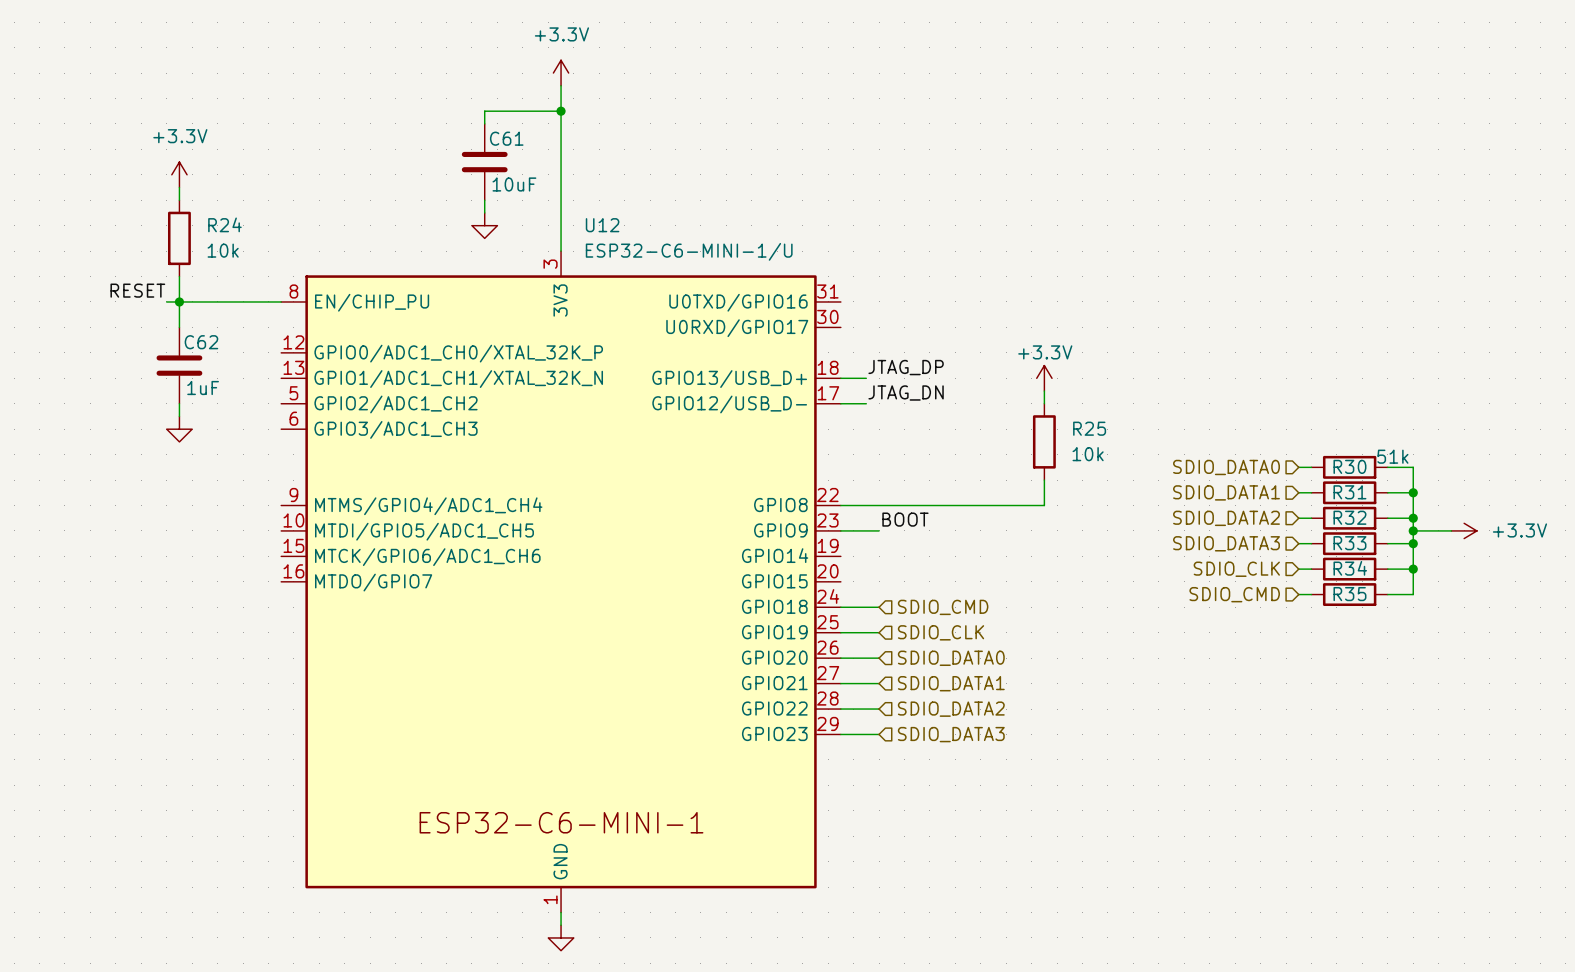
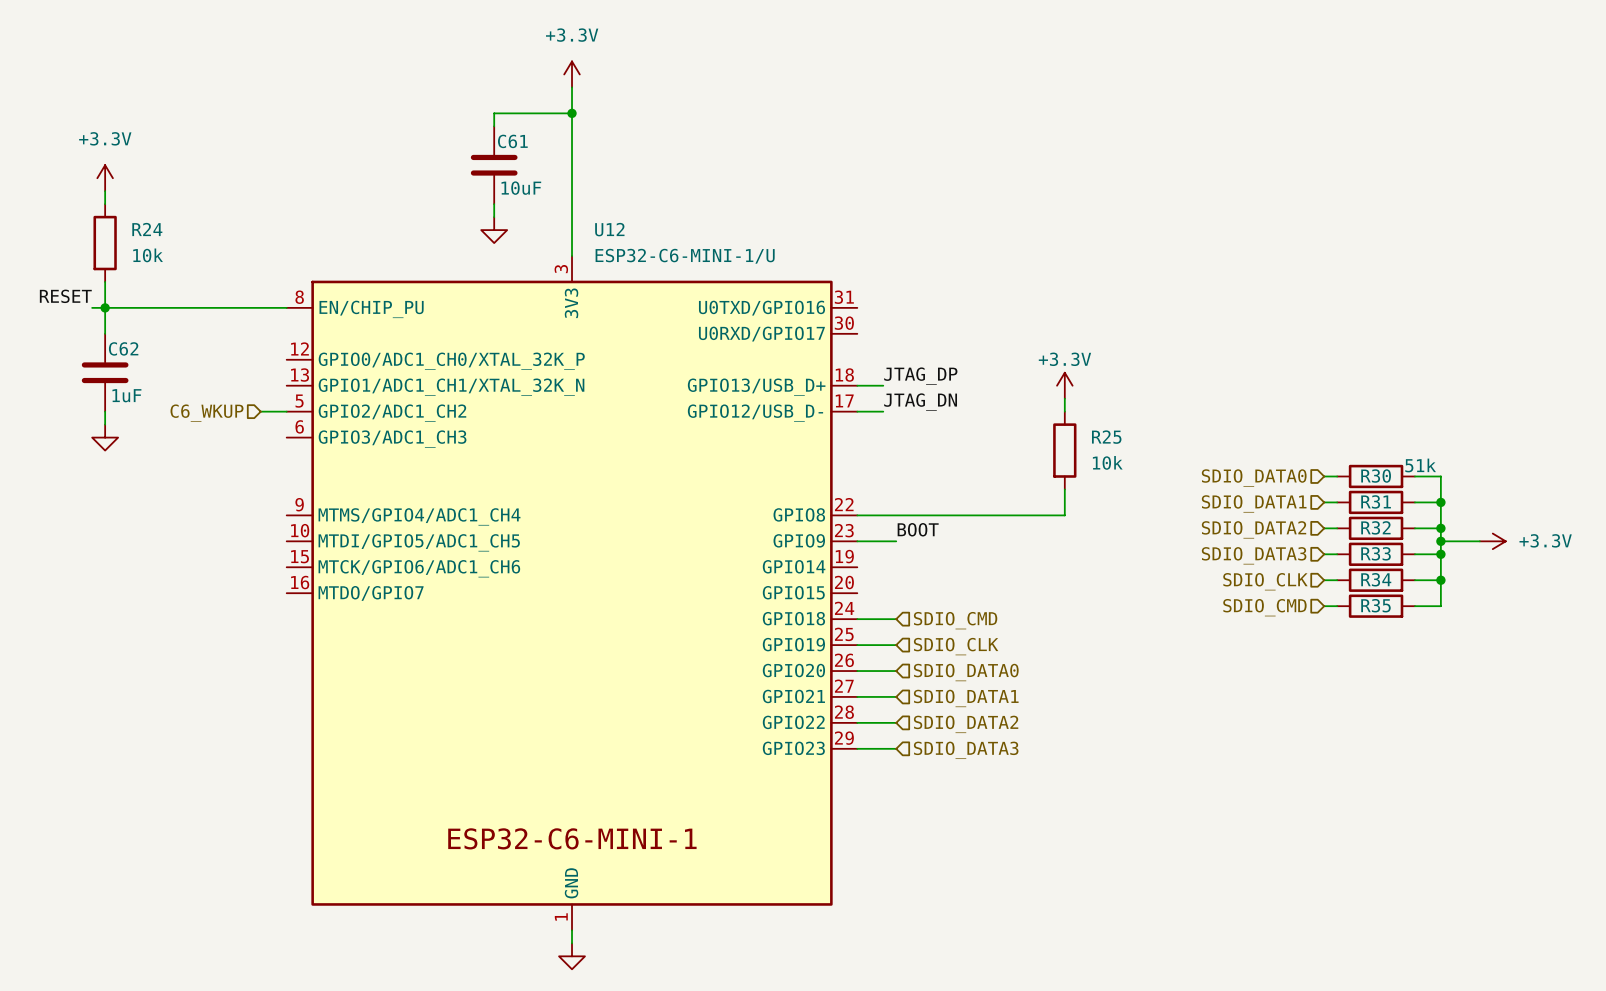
power symbol position: +3.3V (179, 174) -> +3.3V (105, 178)
wire: (179, 187) (179, 200) -> (105, 191) (105, 204)
R24 position: (179, 238) -> (105, 243)
wire: (179, 276) (179, 327) -> (105, 281) (105, 333)
label position: RESET (137, 290) -> RESET (65, 296)
wire: none -> (92, 307) (169, 307)
junction: none -> (105, 307)
junction: (179, 301) -> none
C62 position: (179, 365) -> (105, 372)
wire: (179, 403) (179, 416) -> (105, 411) (105, 424)
hierarchical label: none -> C6_WKUP (207, 413)
wire: none -> (260, 411) (286, 411)
power symbol position: (179, 429) -> (105, 437)

